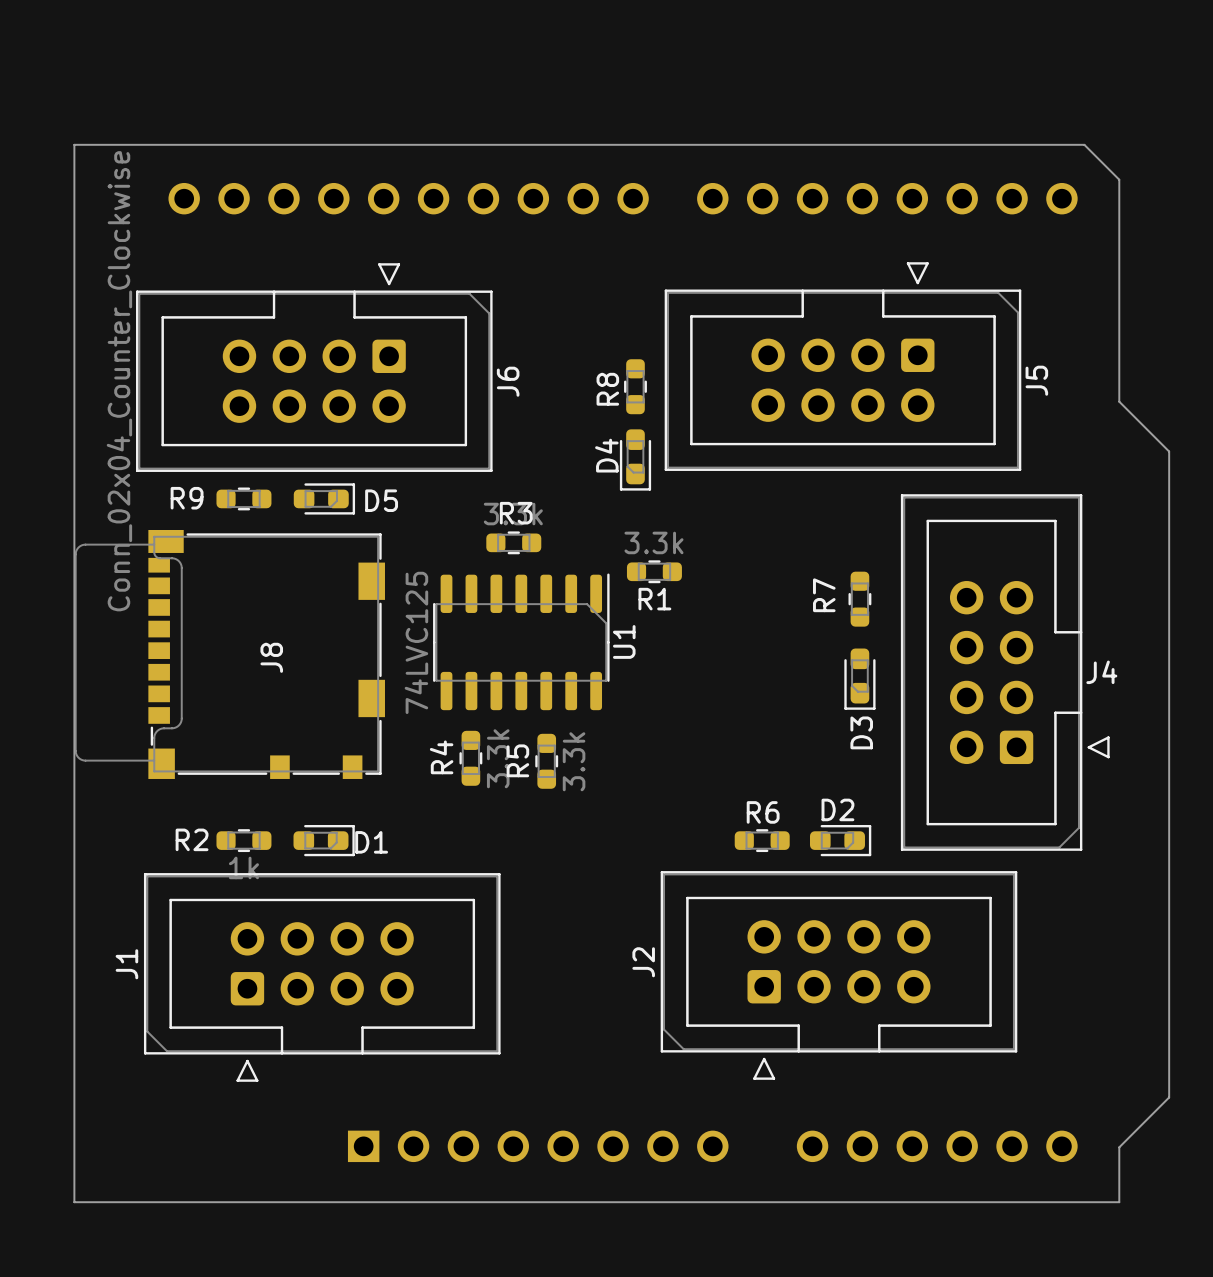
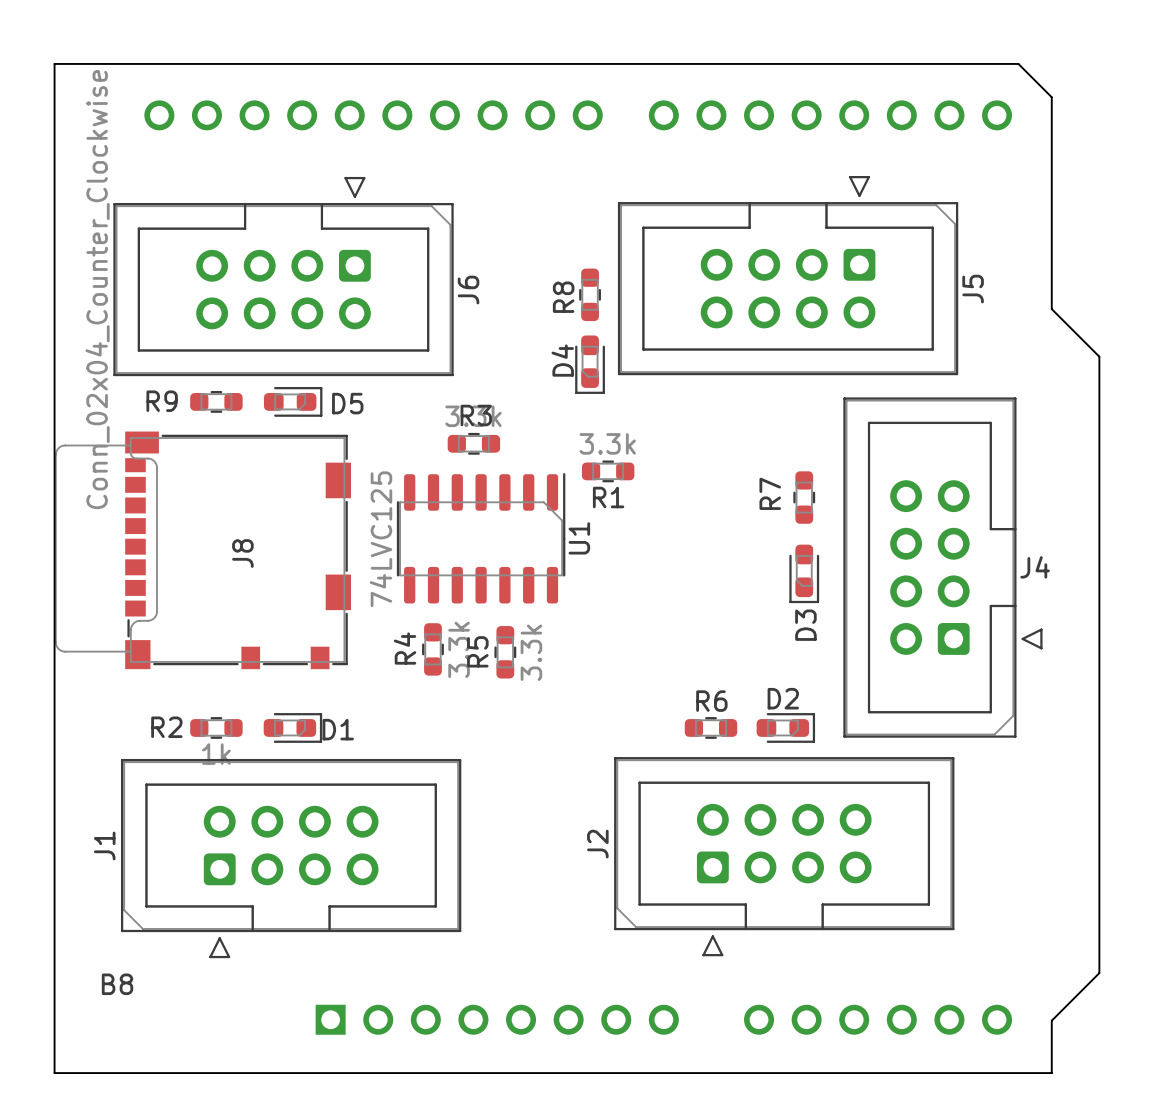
text: none -> B8 (117, 984)

